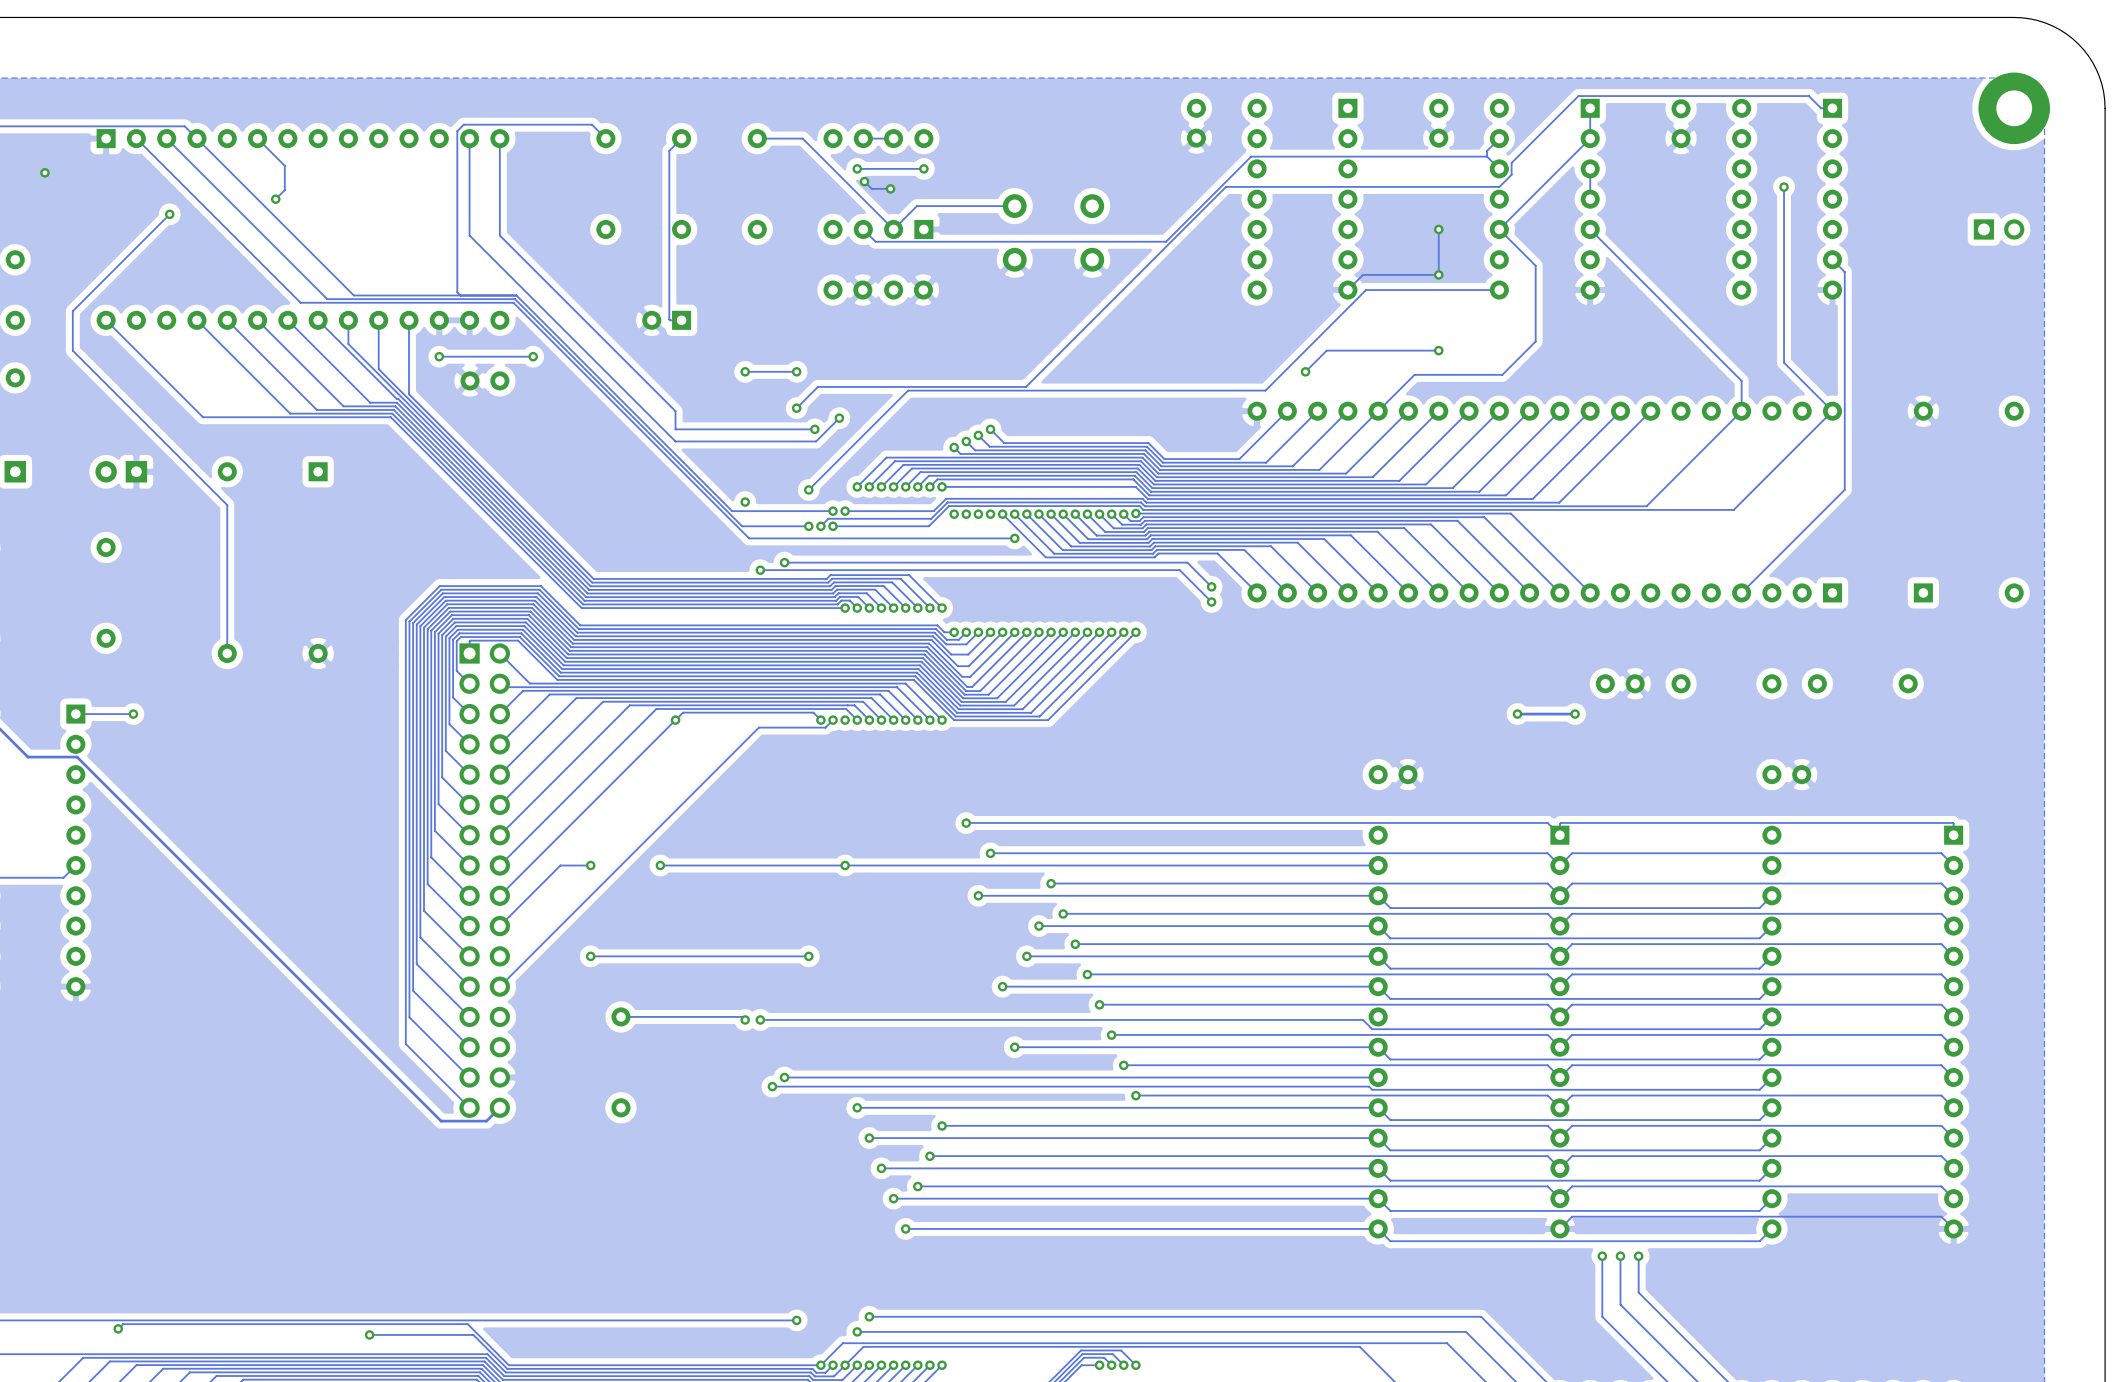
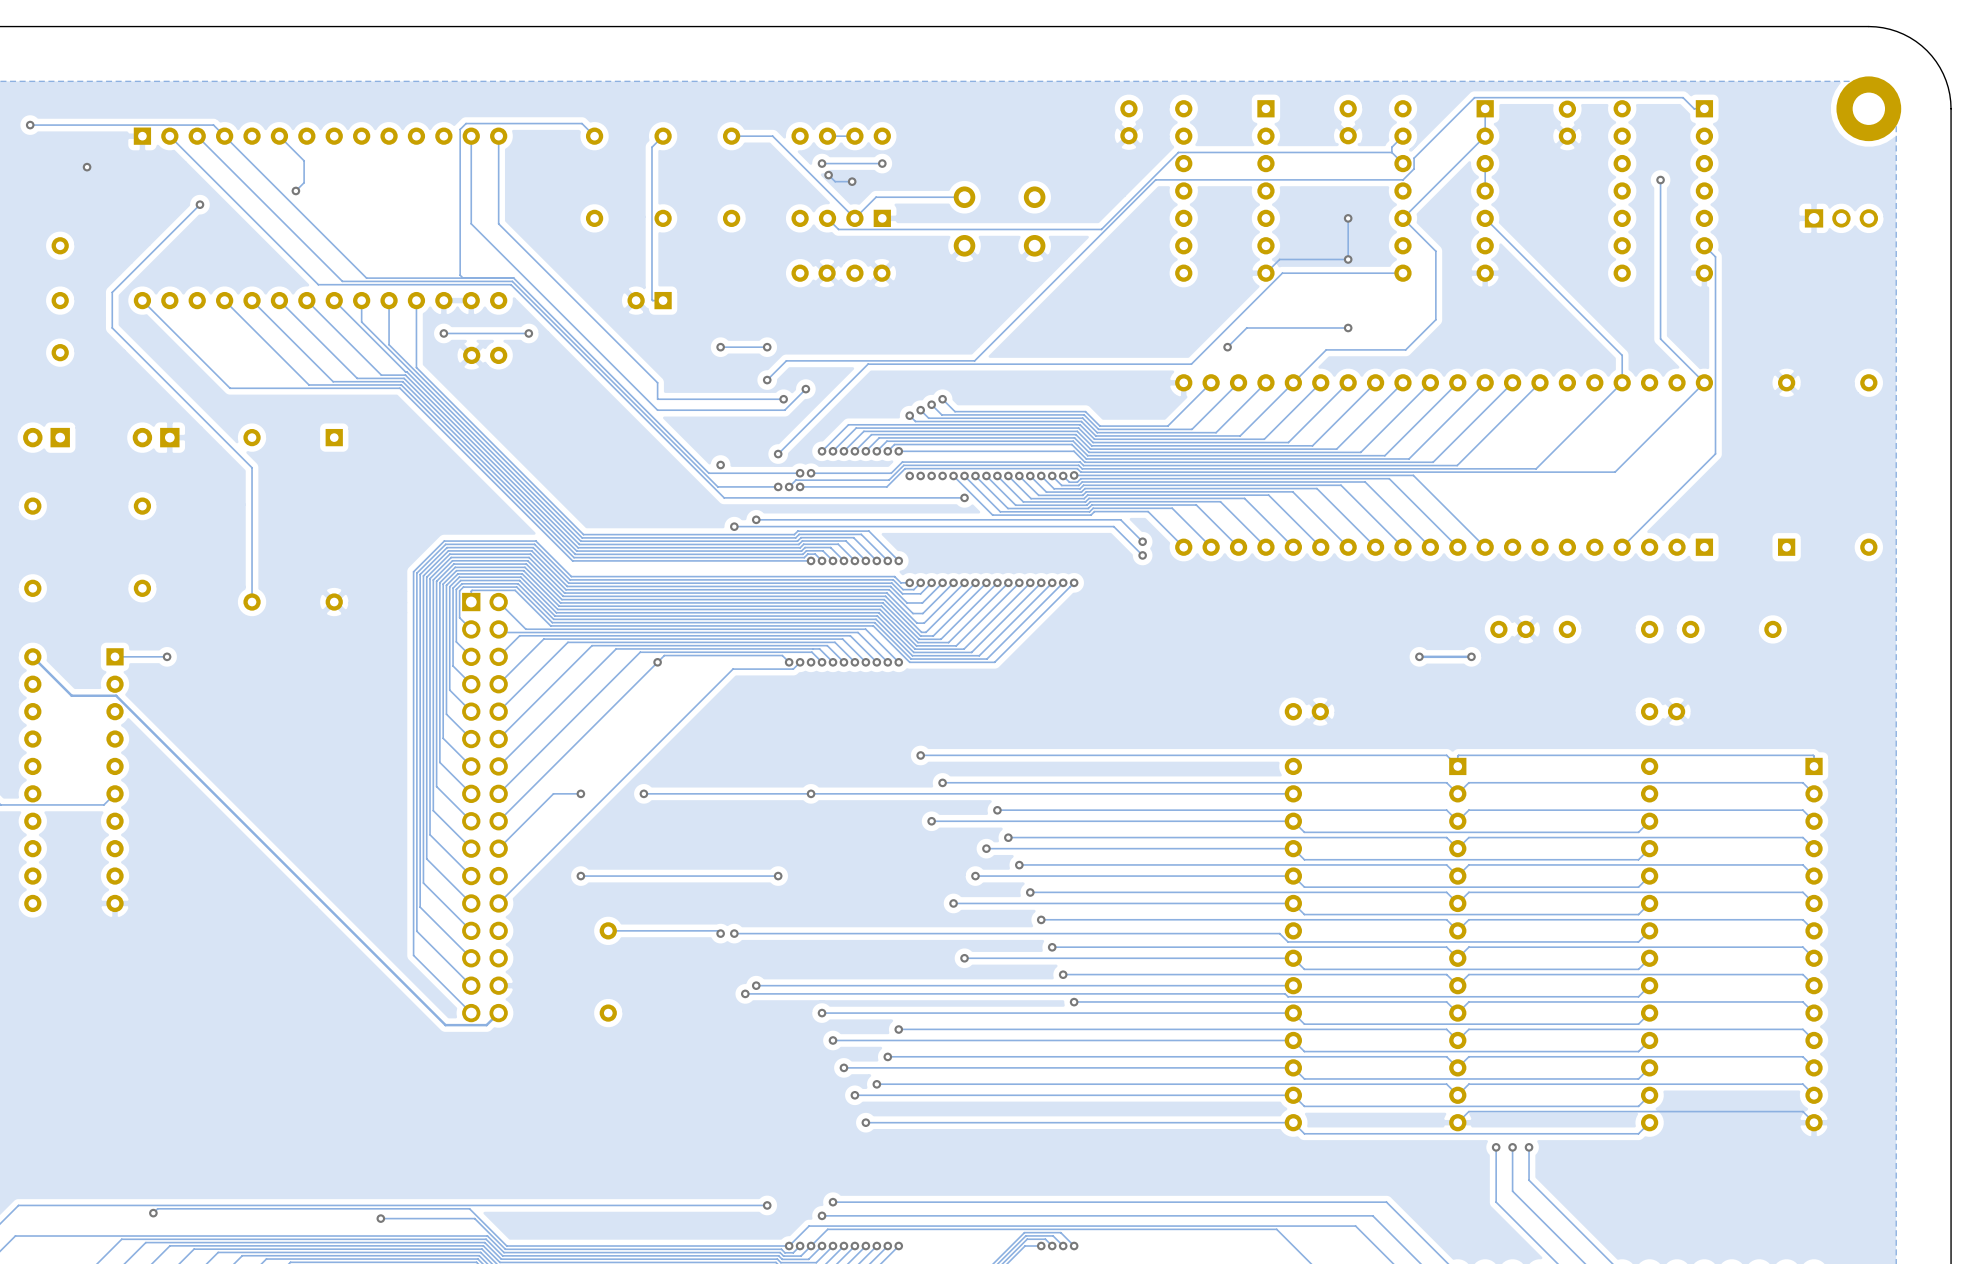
part: none -> (1841, 218)
part: (1999, 229) -> none

